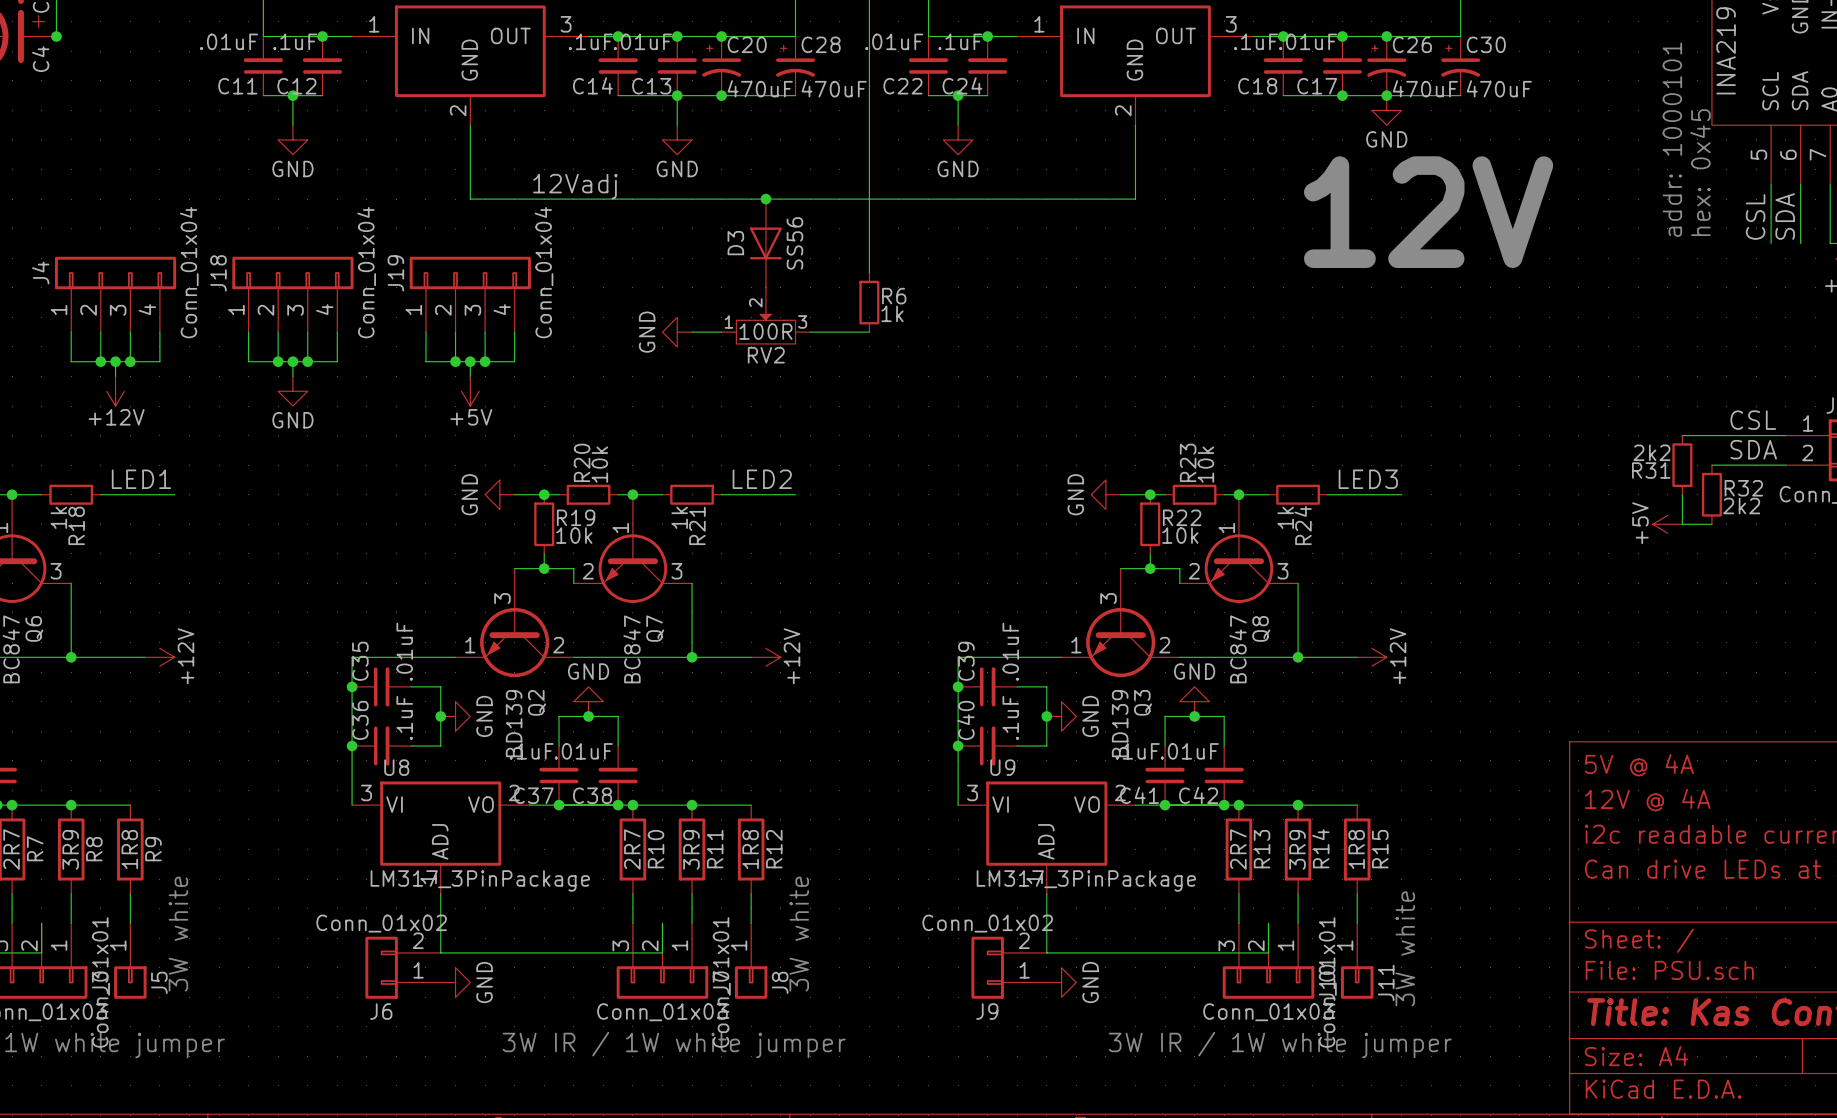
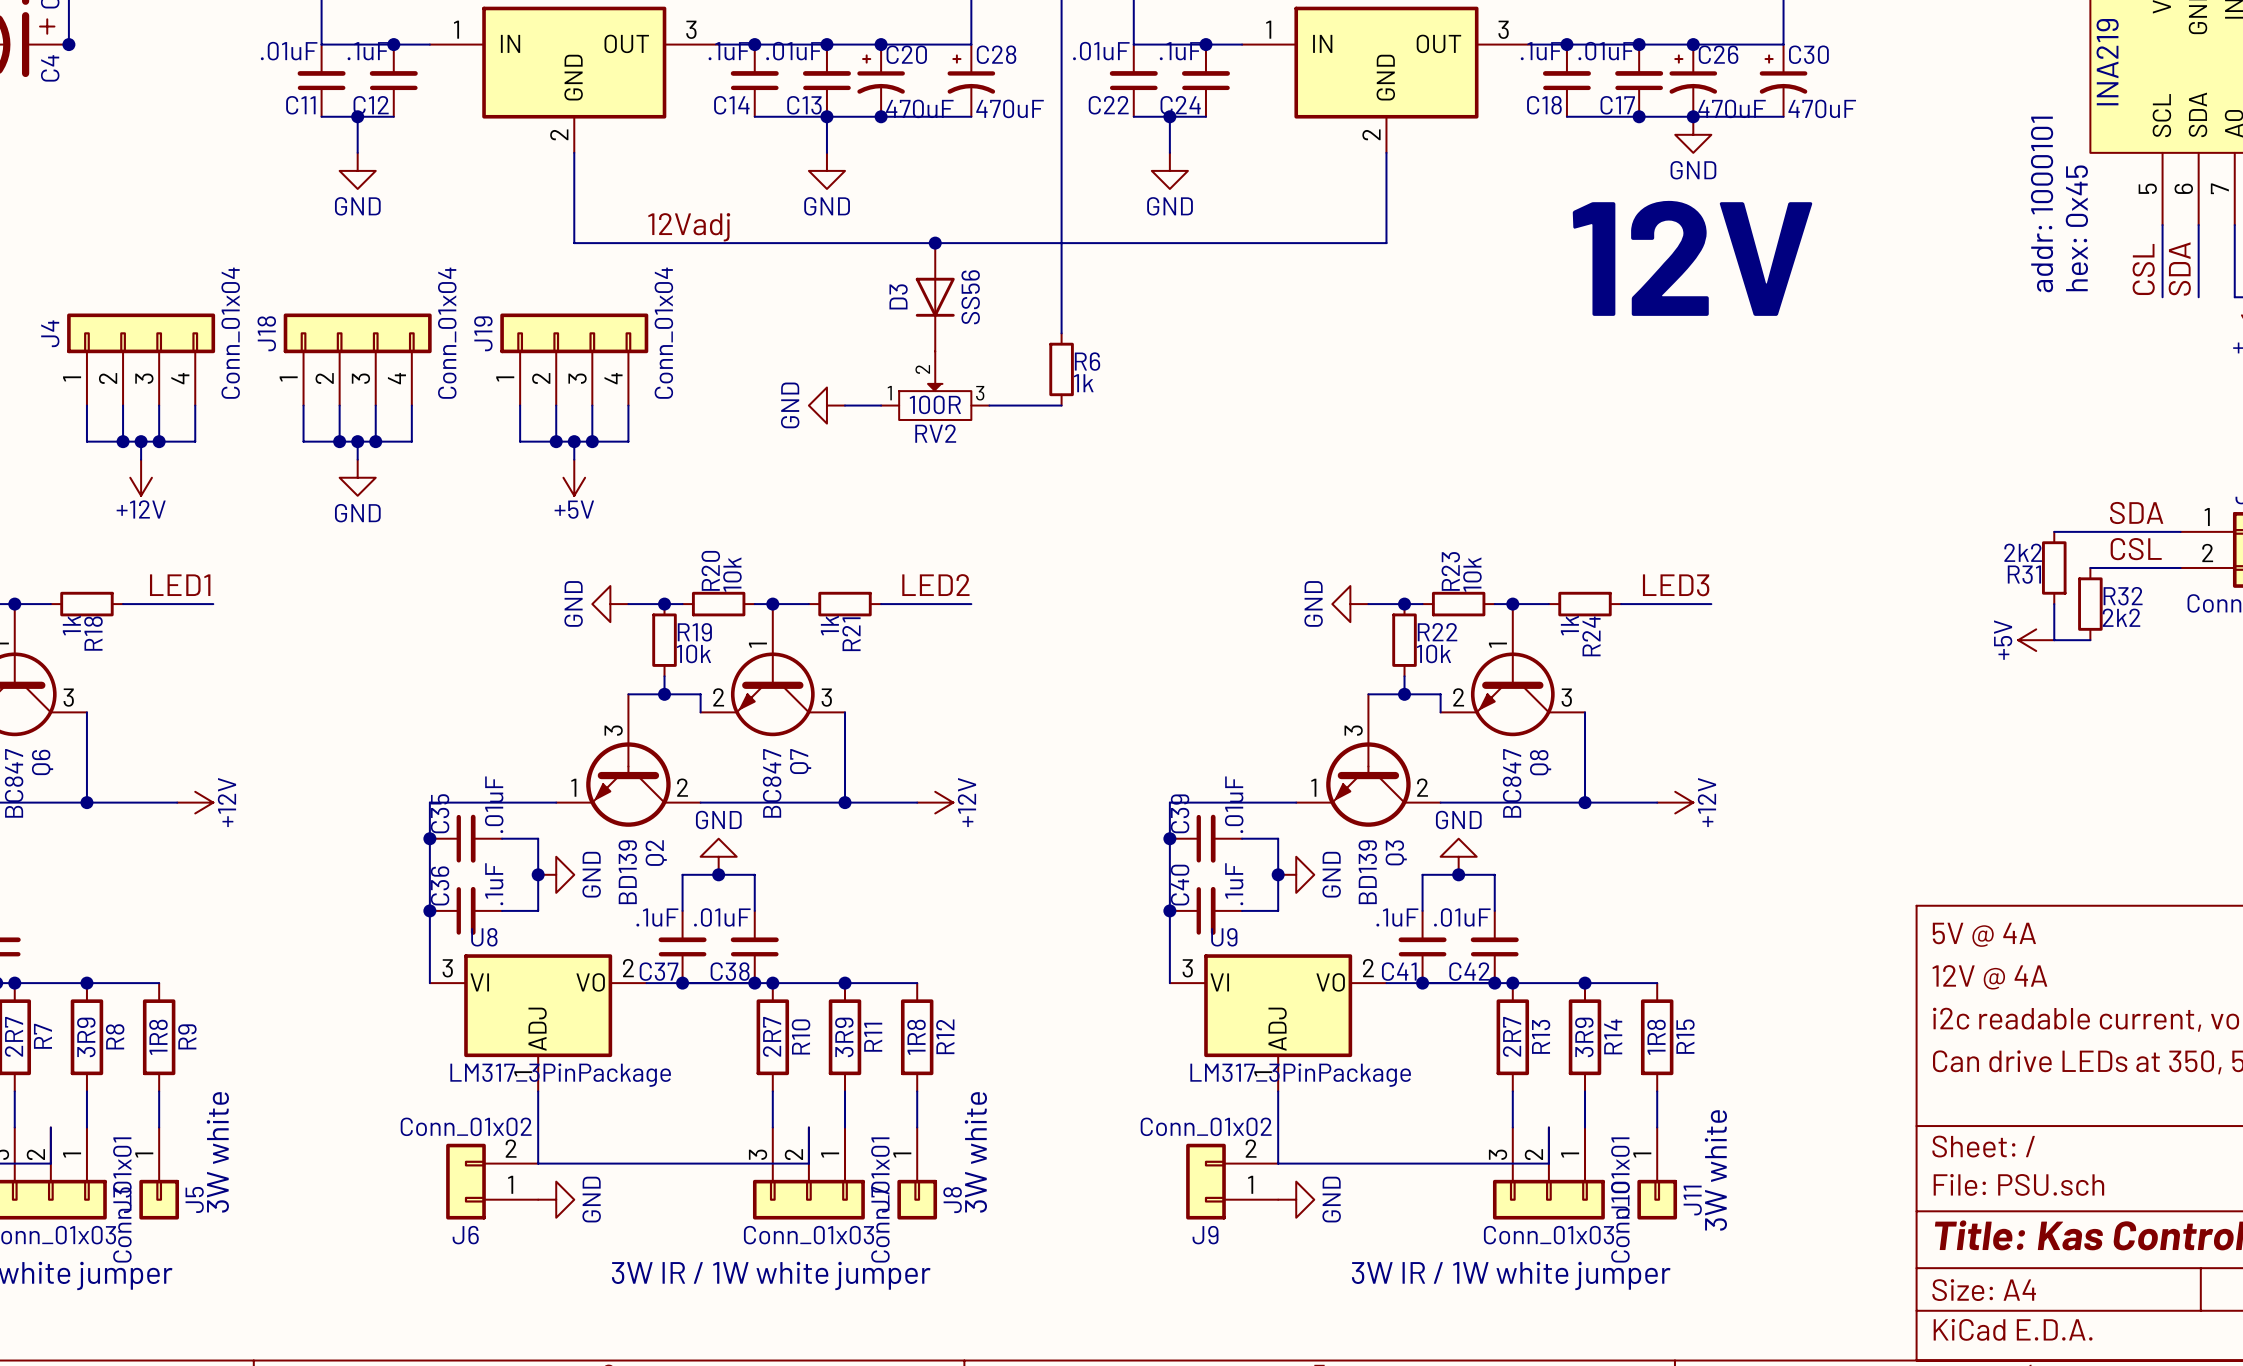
label: CSL (1753, 420) -> SDA (2136, 512)
label: SDA (1753, 449) -> CSL (2136, 549)

